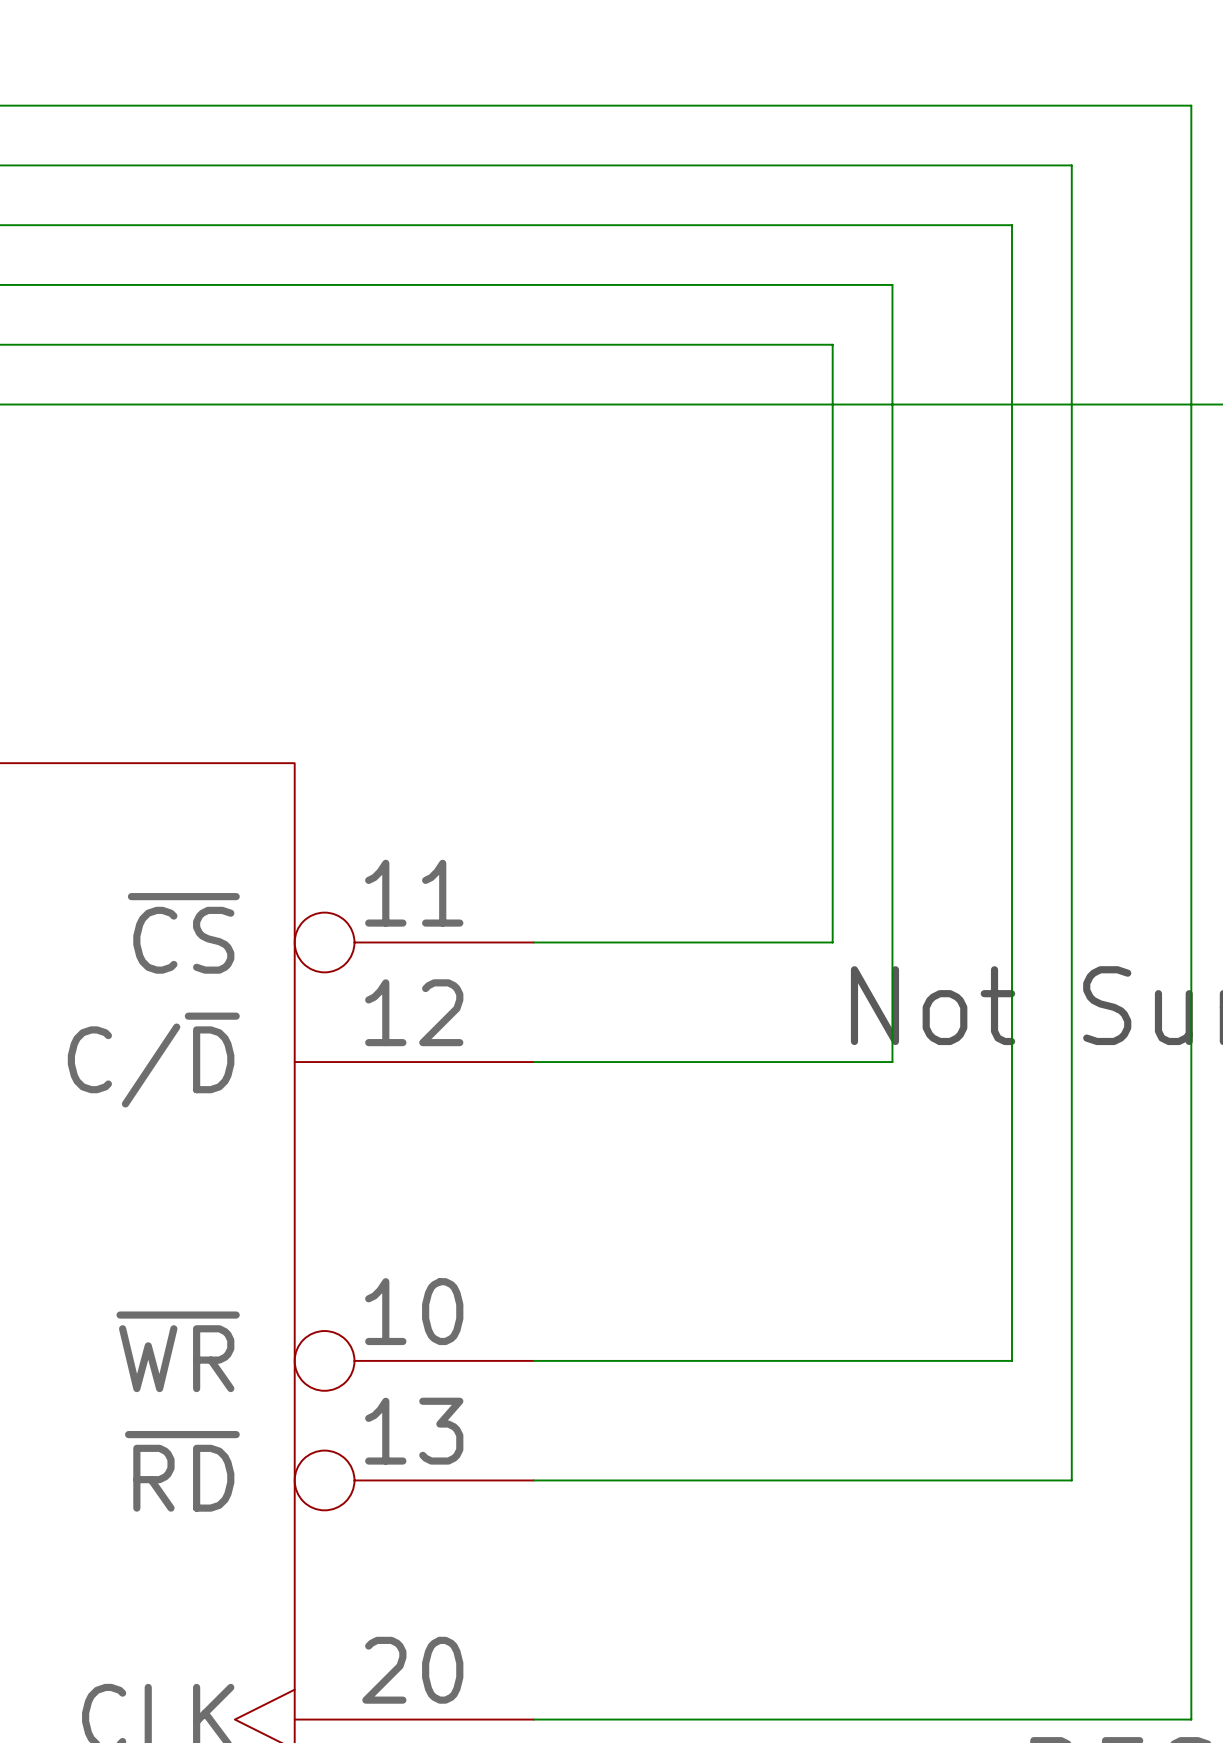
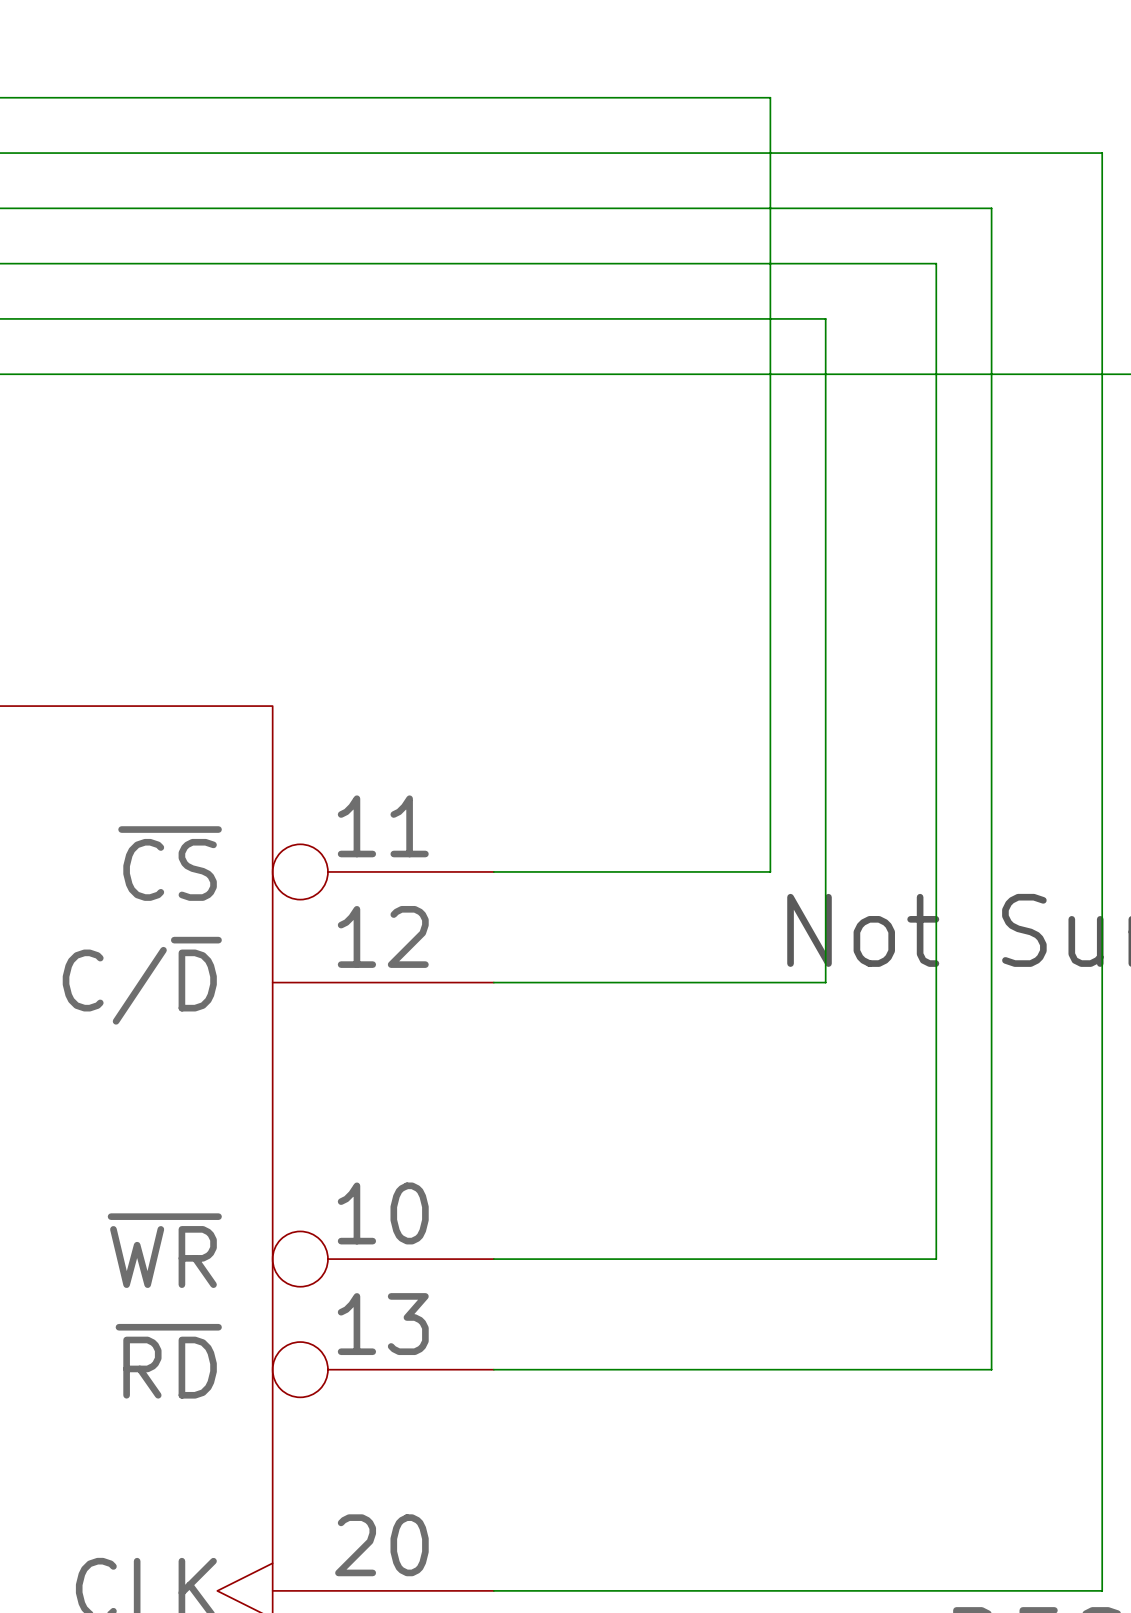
wire: (832, 105) (1191, 105) (1191, 165) -> (991, 153) (1102, 153)
wire: none -> (770, 97) (770, 318) (825, 318)
wire: (1071, 165) (1071, 225) -> (936, 208) (991, 208)
wire: (1012, 225) (1012, 284) -> none
wire: (892, 284) (892, 344) -> (825, 263) (936, 263)

